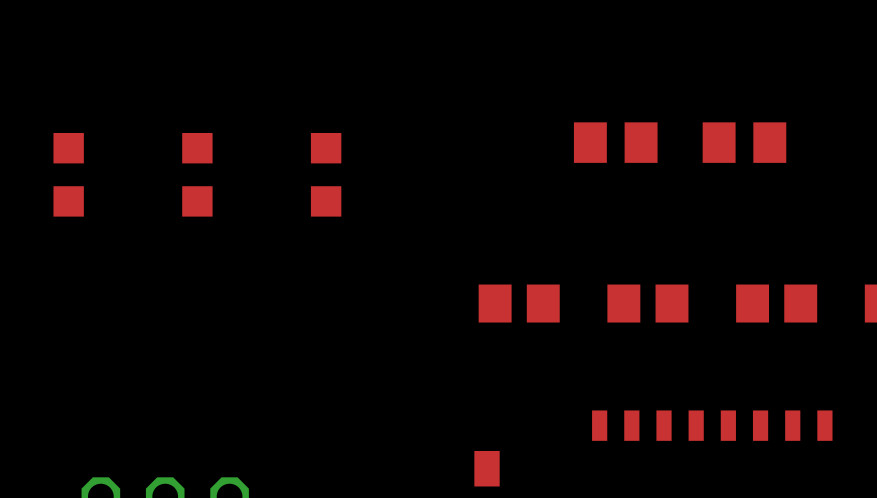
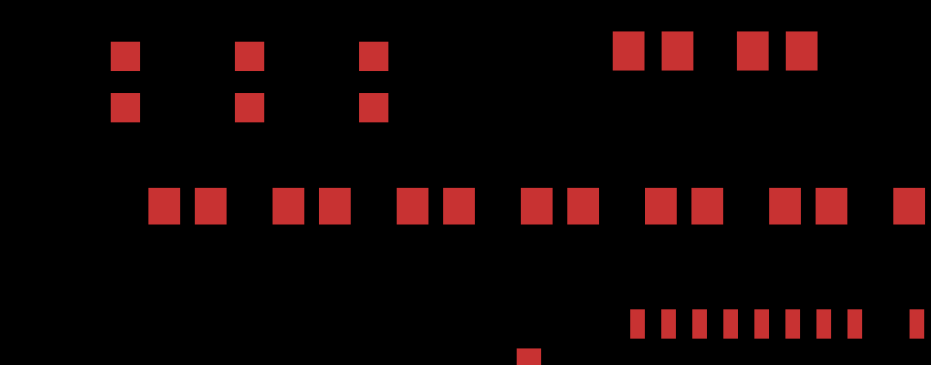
part: none -> (187, 206)
part: none -> (311, 206)
part: none -> (435, 206)

